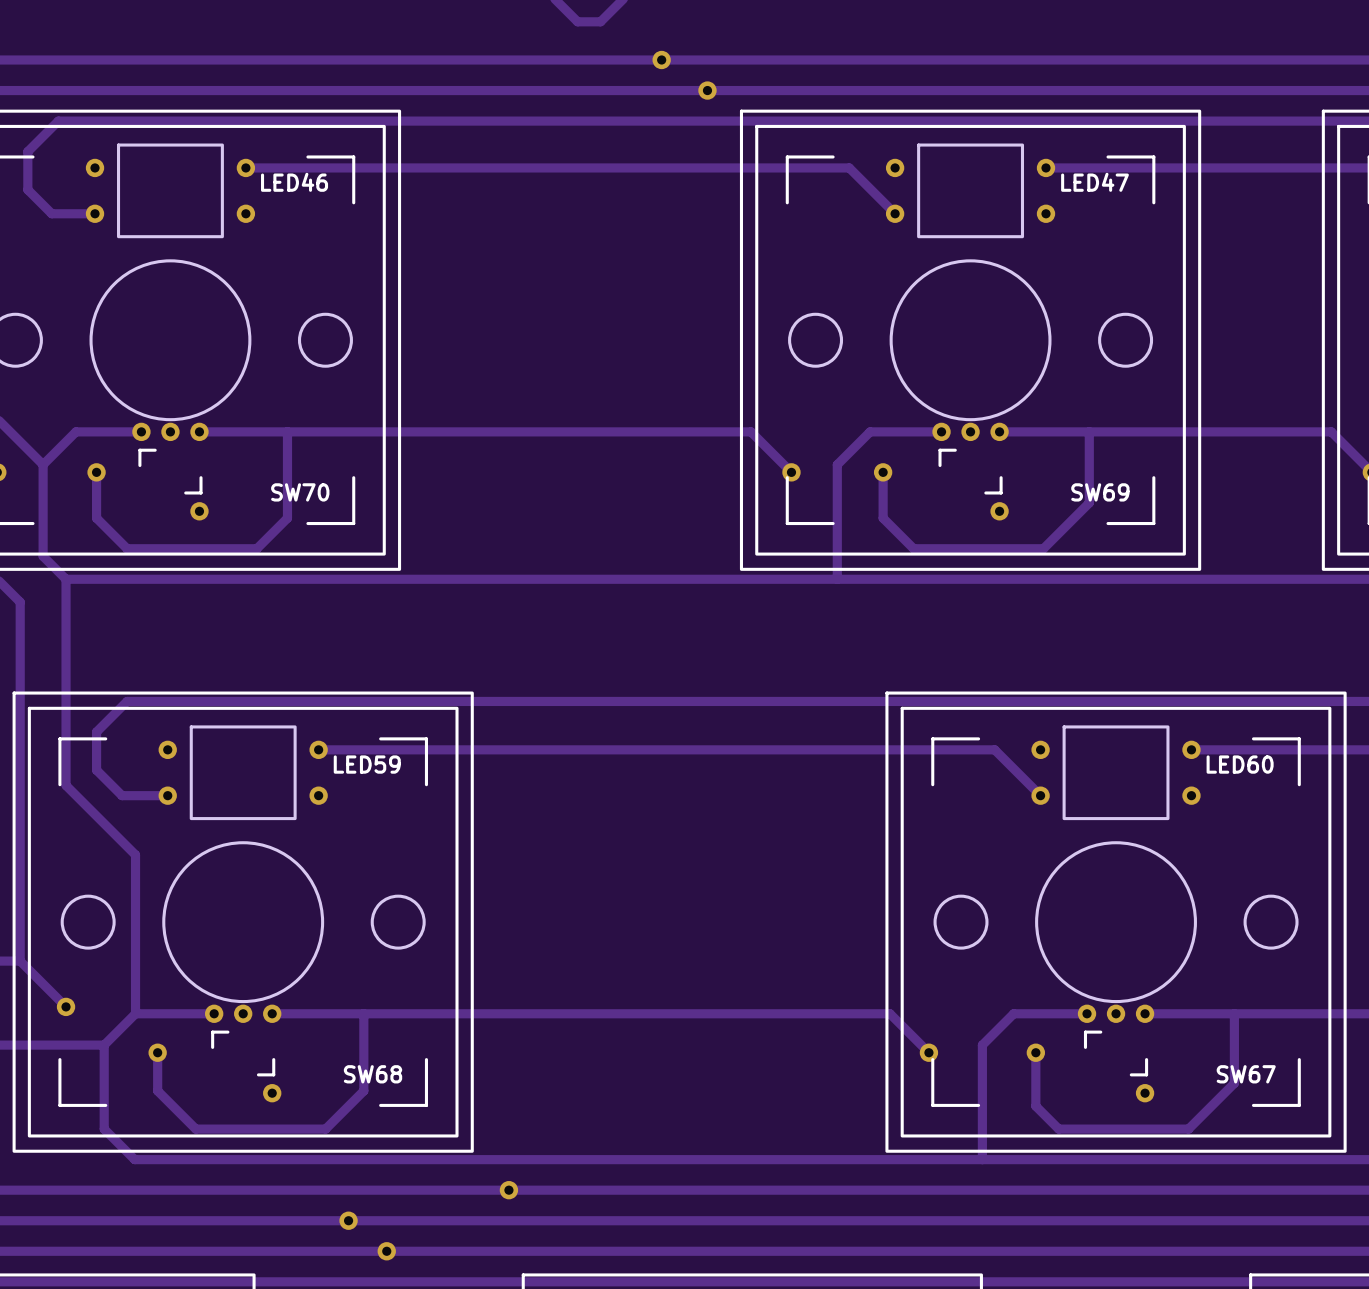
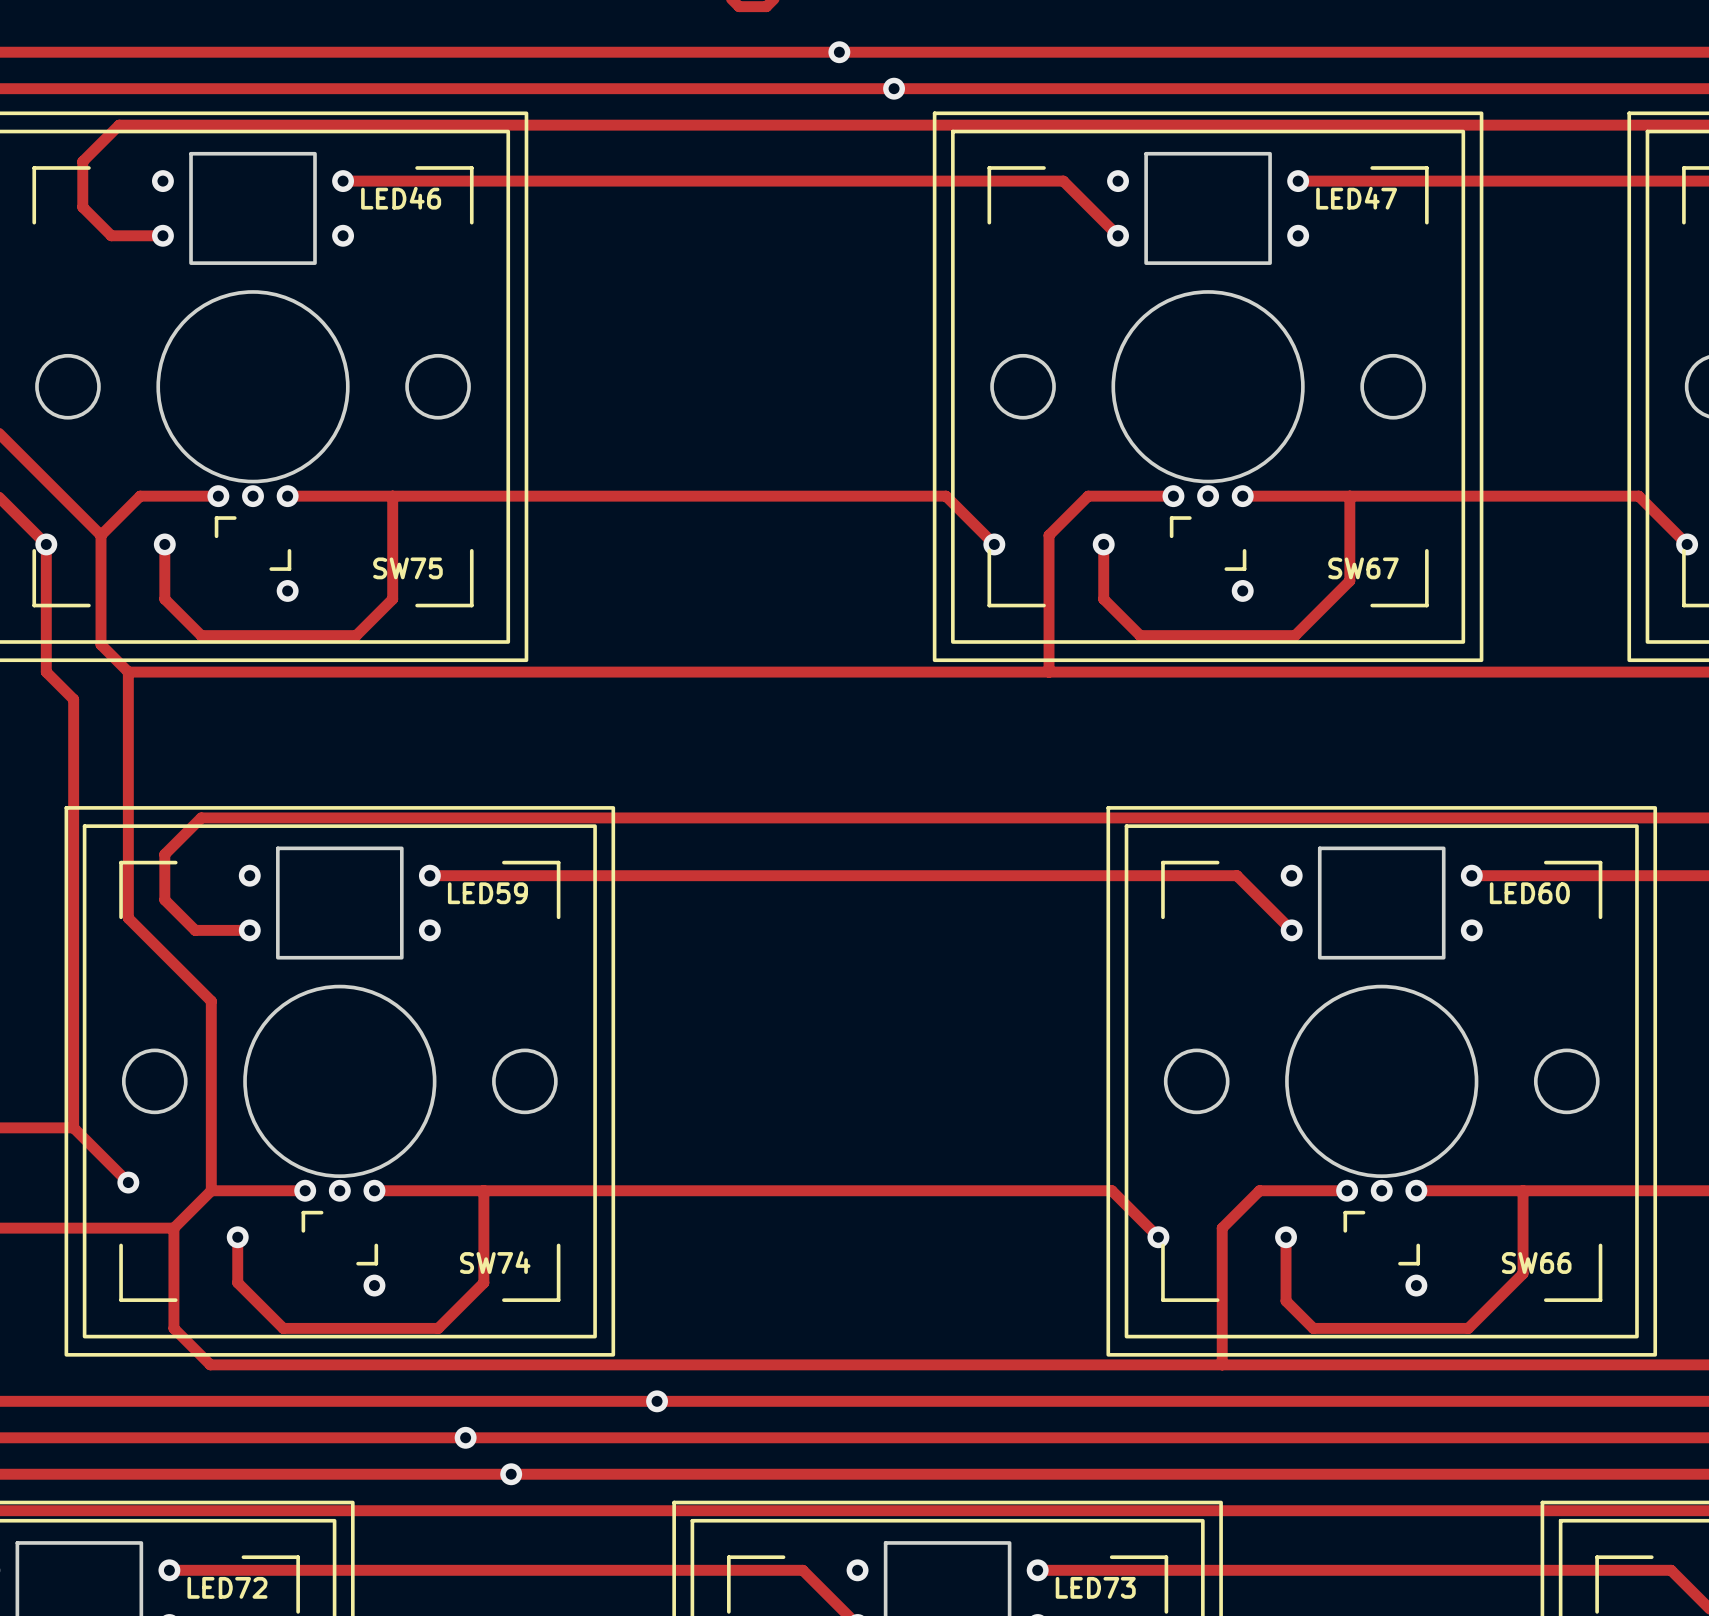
SW70 name: SW70 (300, 492) -> SW75 (407, 568)
SW69 name: SW69 (1100, 492) -> SW67 (1363, 568)
SW68 name: SW68 (373, 1074) -> SW74 (495, 1262)
SW67 name: SW67 (1246, 1074) -> SW66 (1536, 1263)

